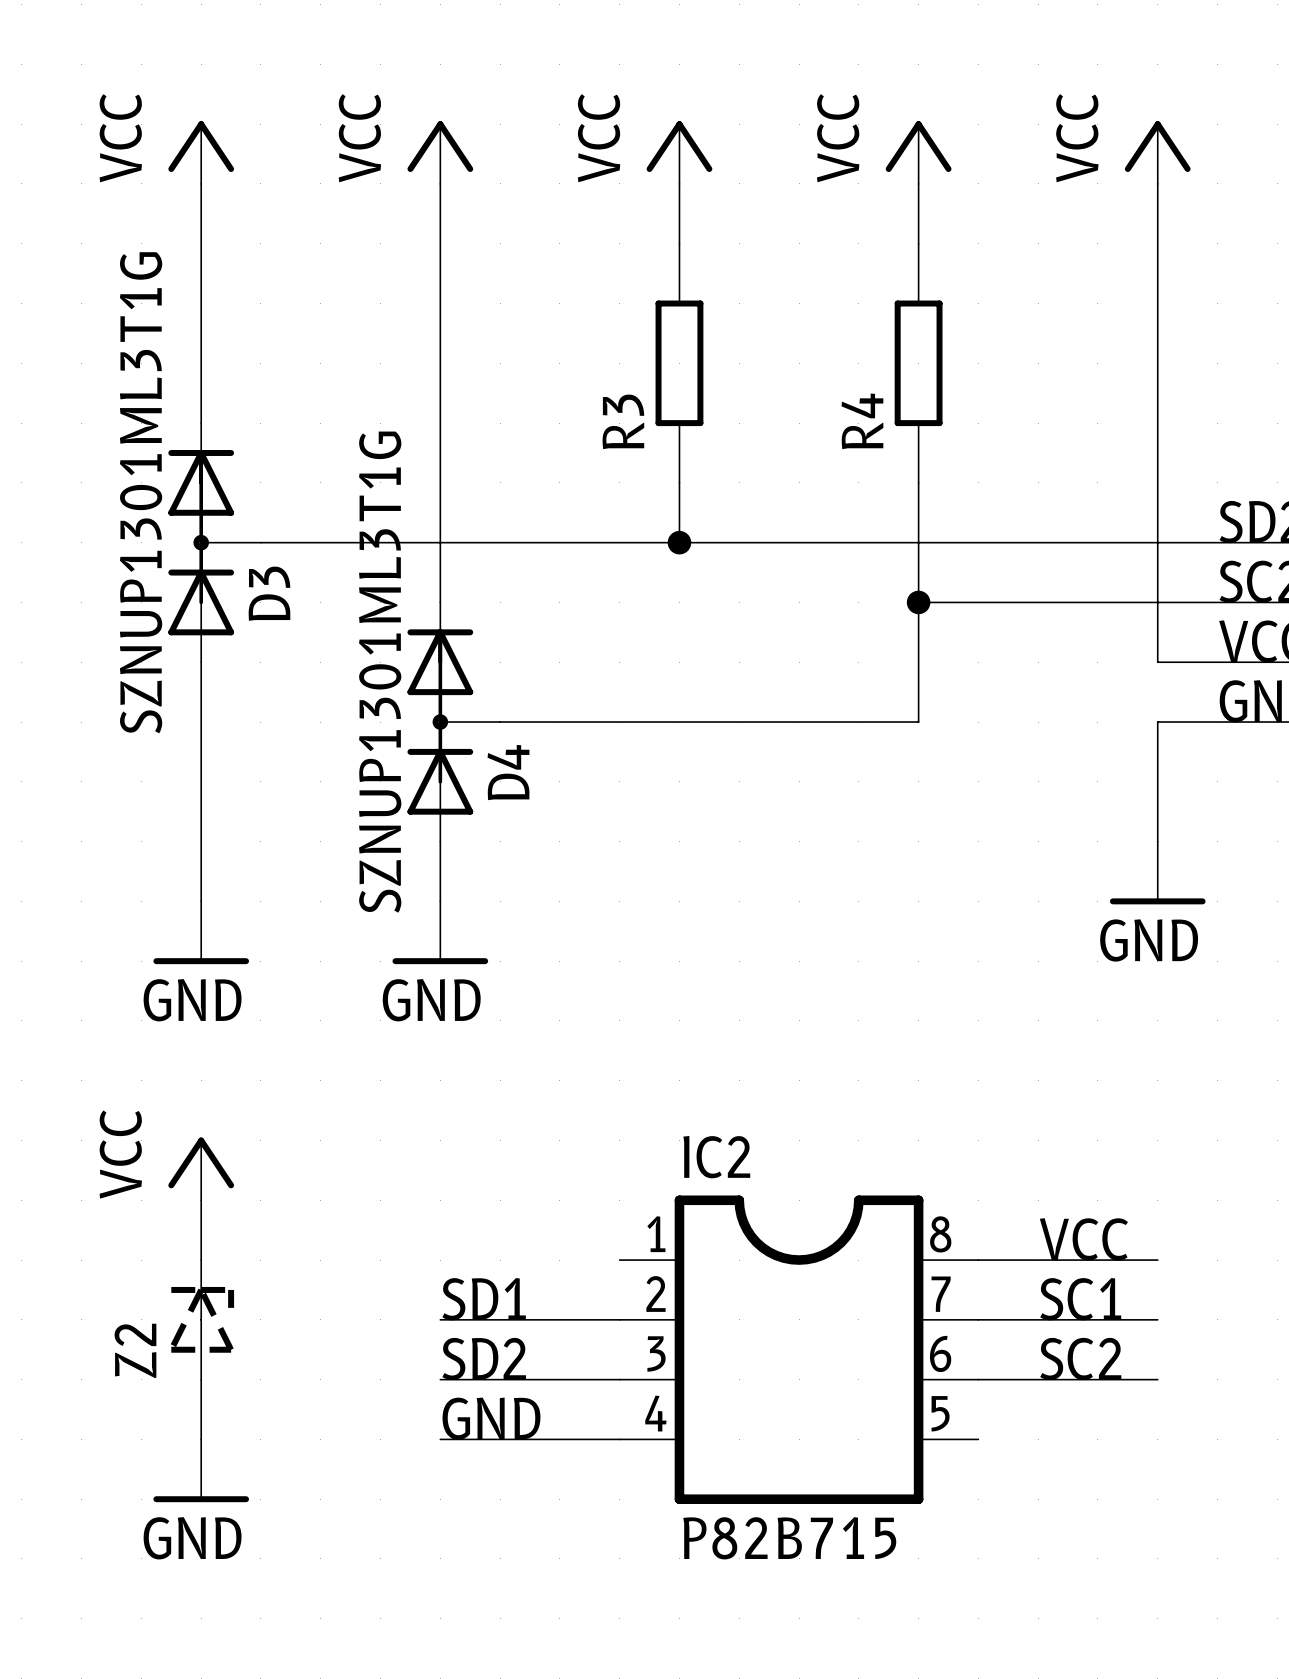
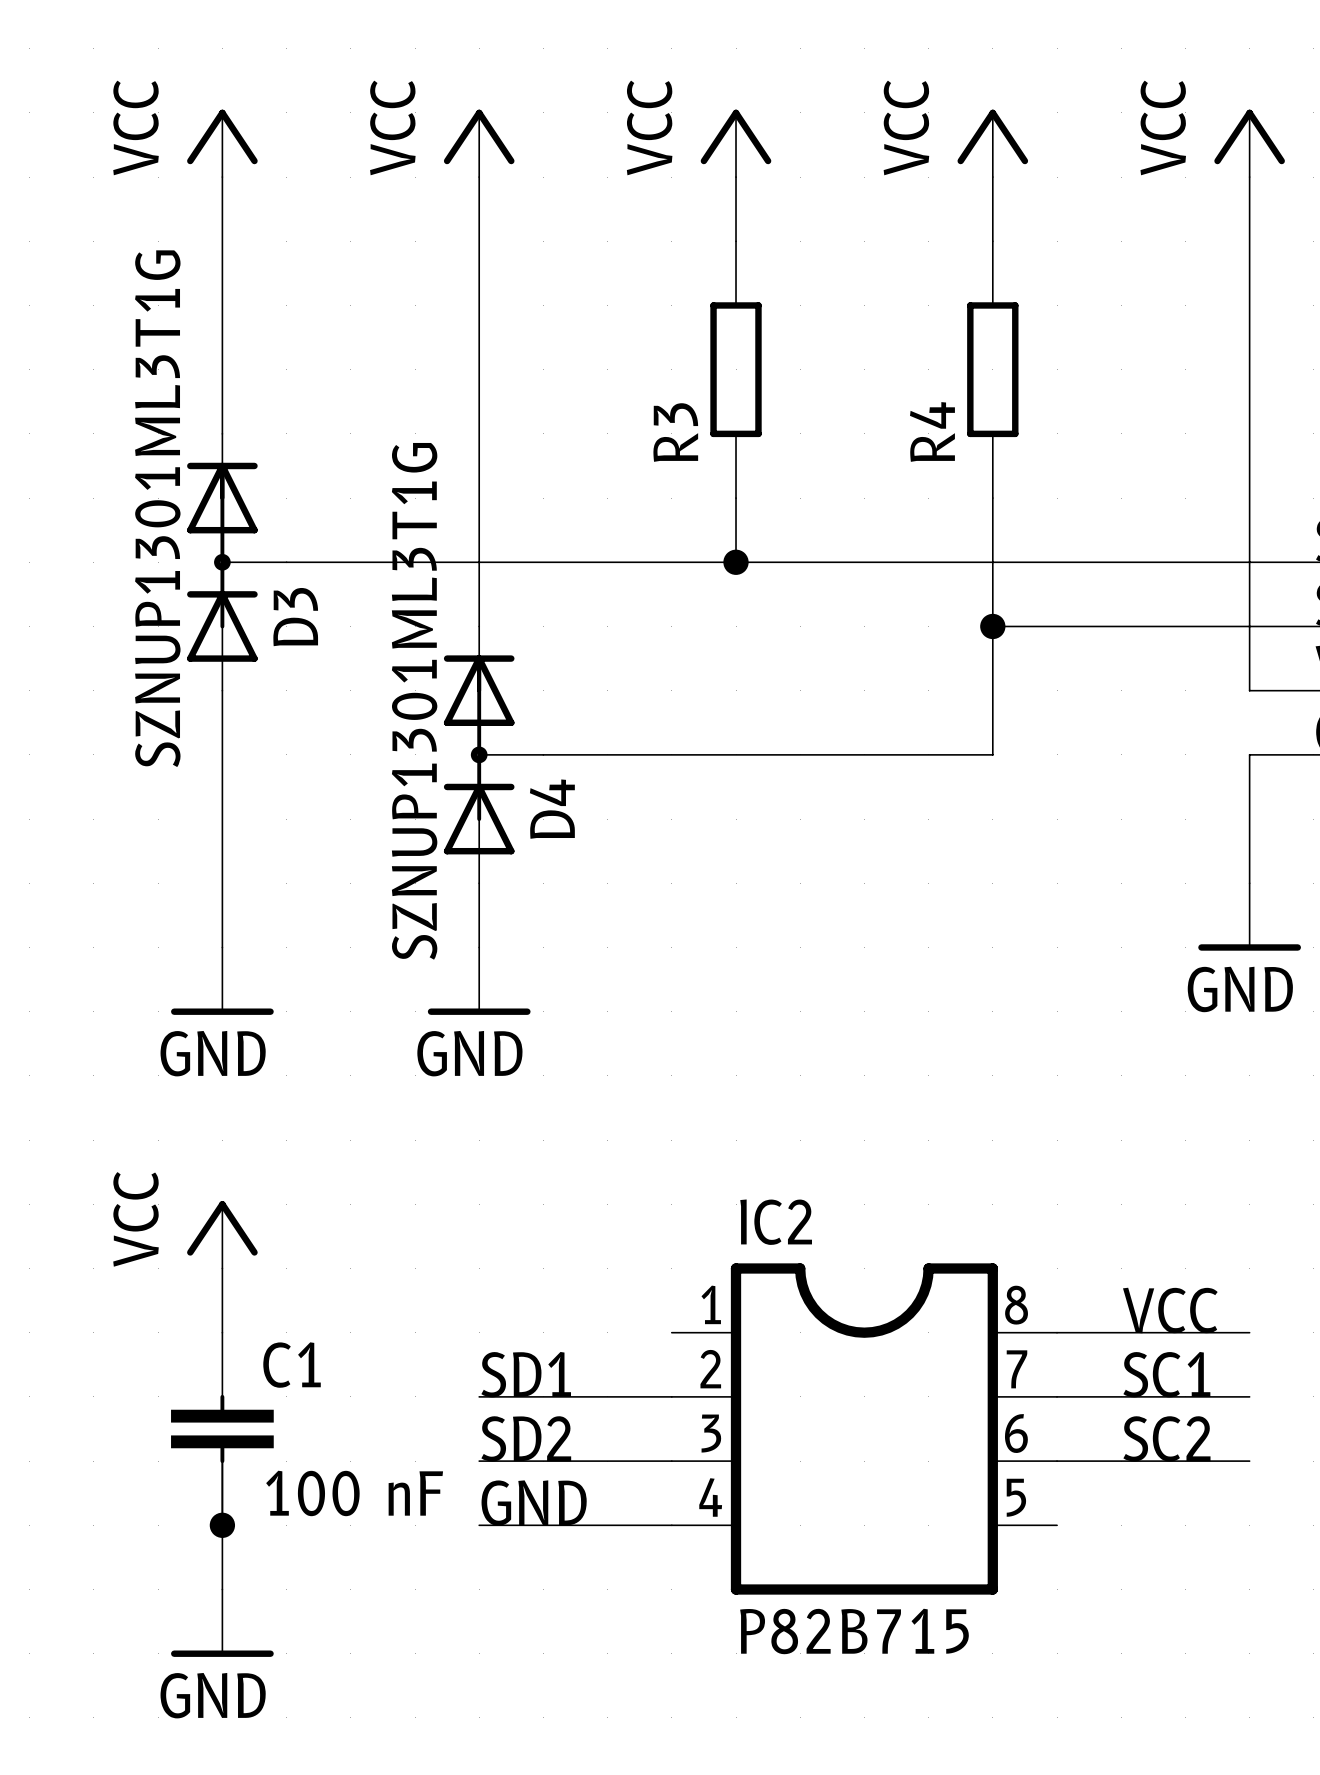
Z2: (201, 1319) -> none
C1: none -> 100 nF (222, 1429)
junction: none -> (222, 1525)
power symbol position: GND (201, 1470) -> GND (222, 1623)

